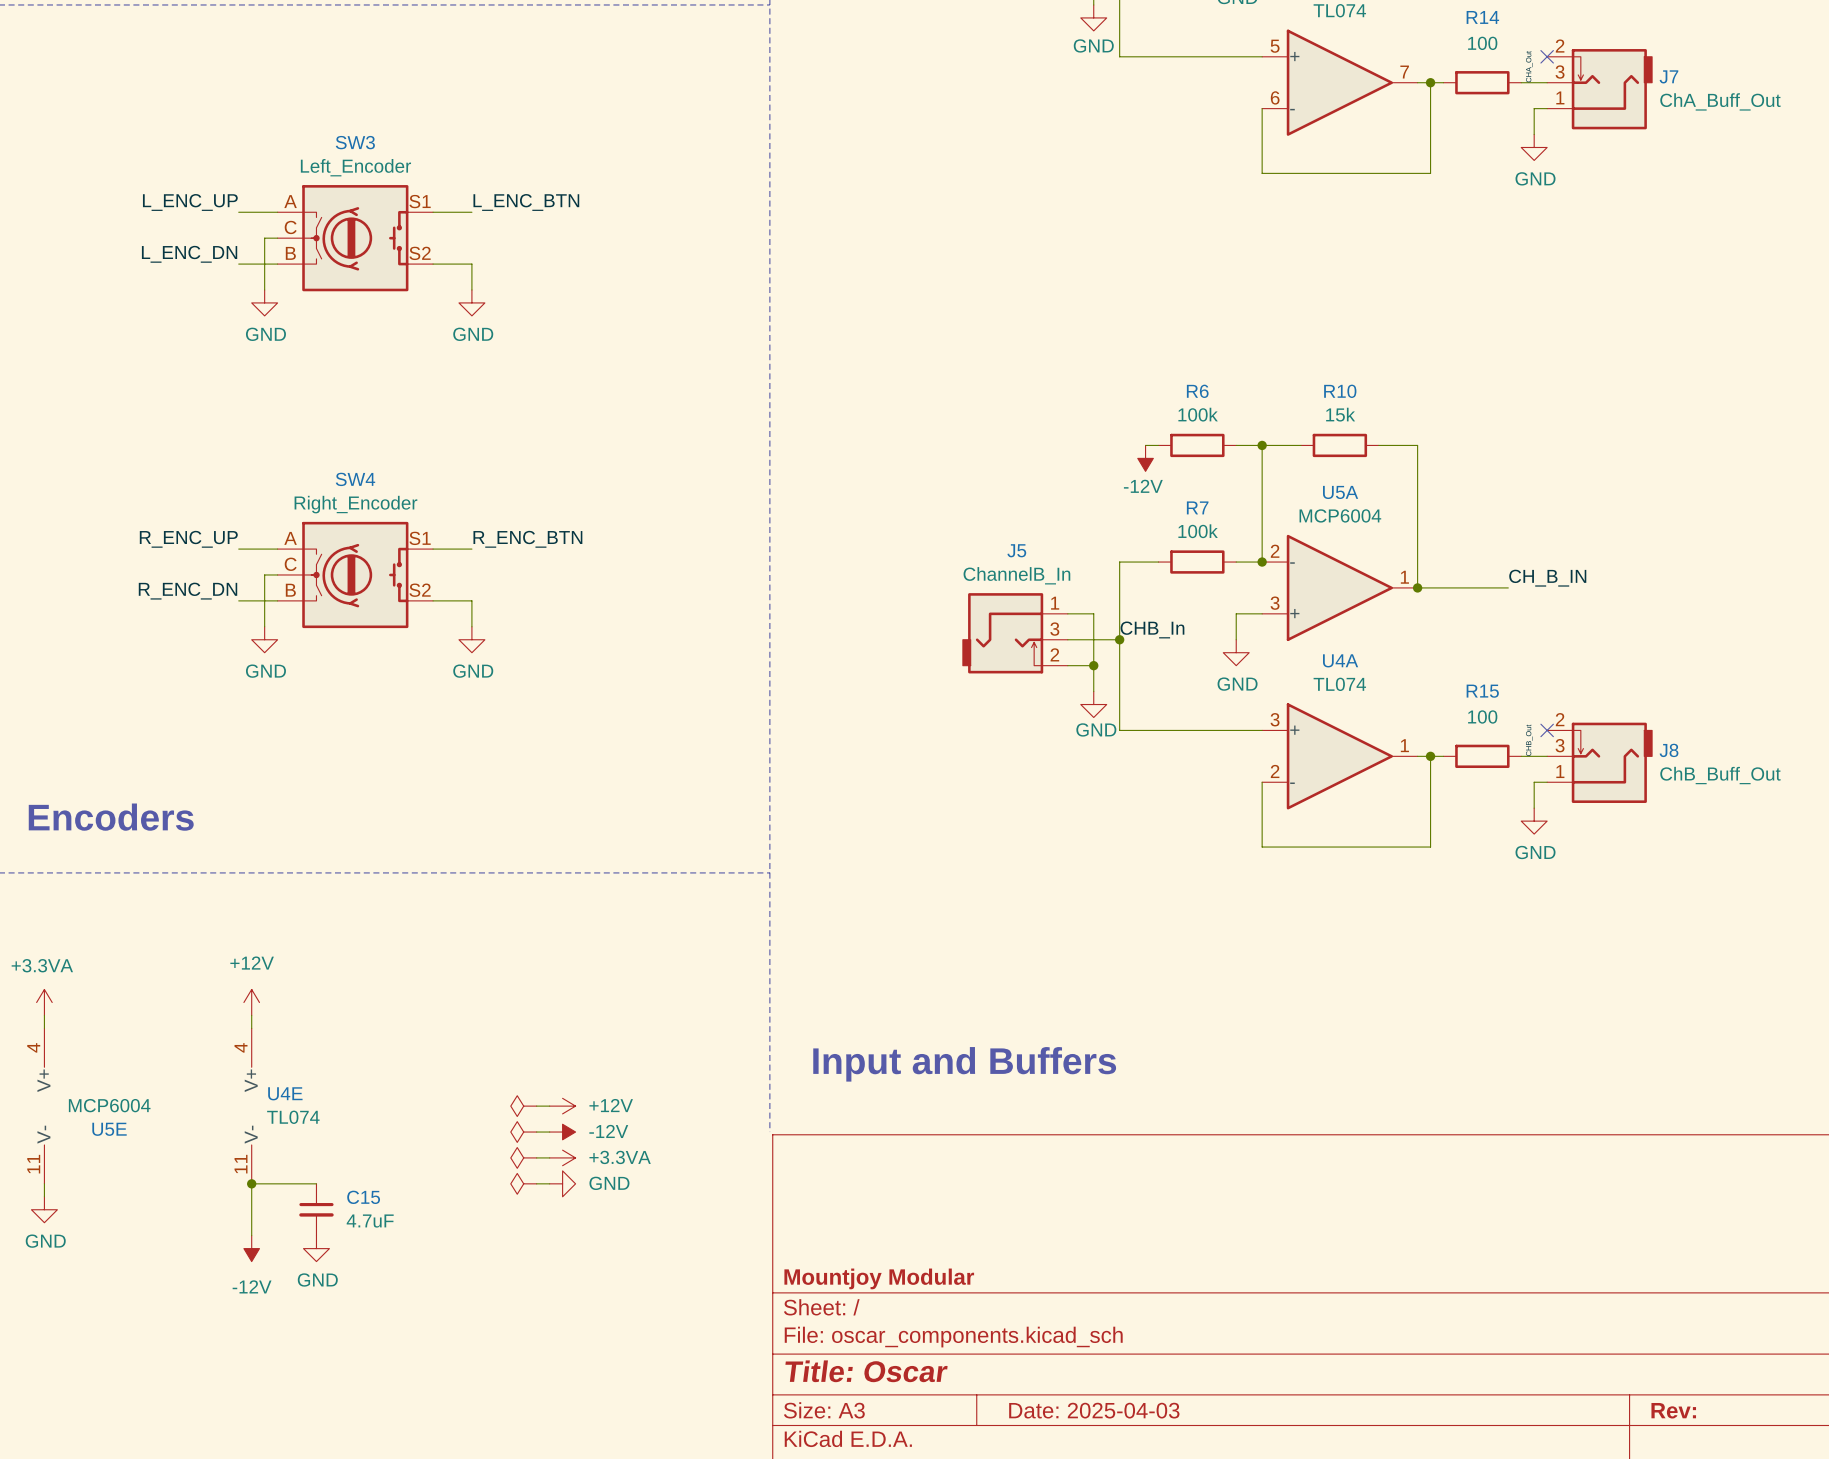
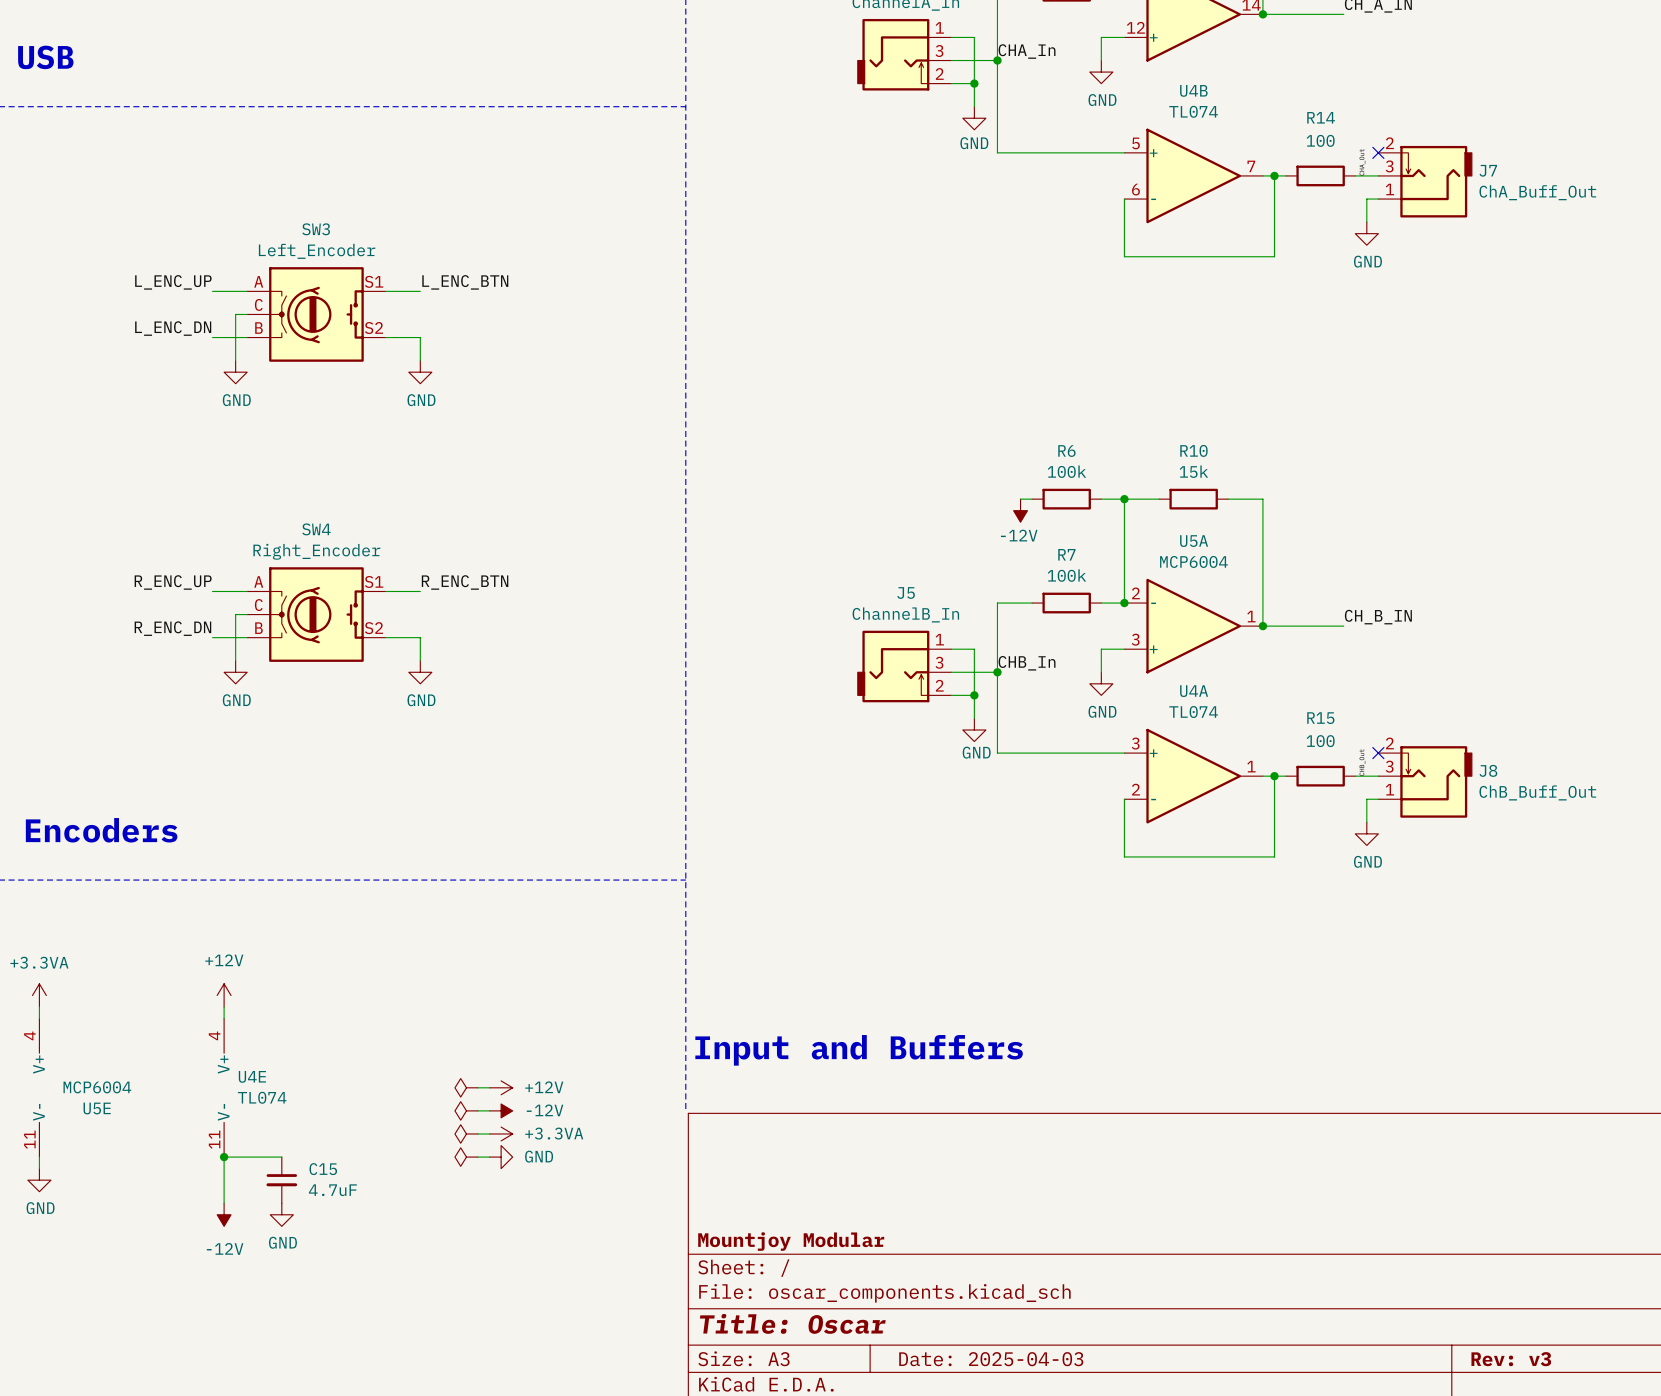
title block: Rev: (1673, 1410) -> Rev: v3 (1511, 1359)

